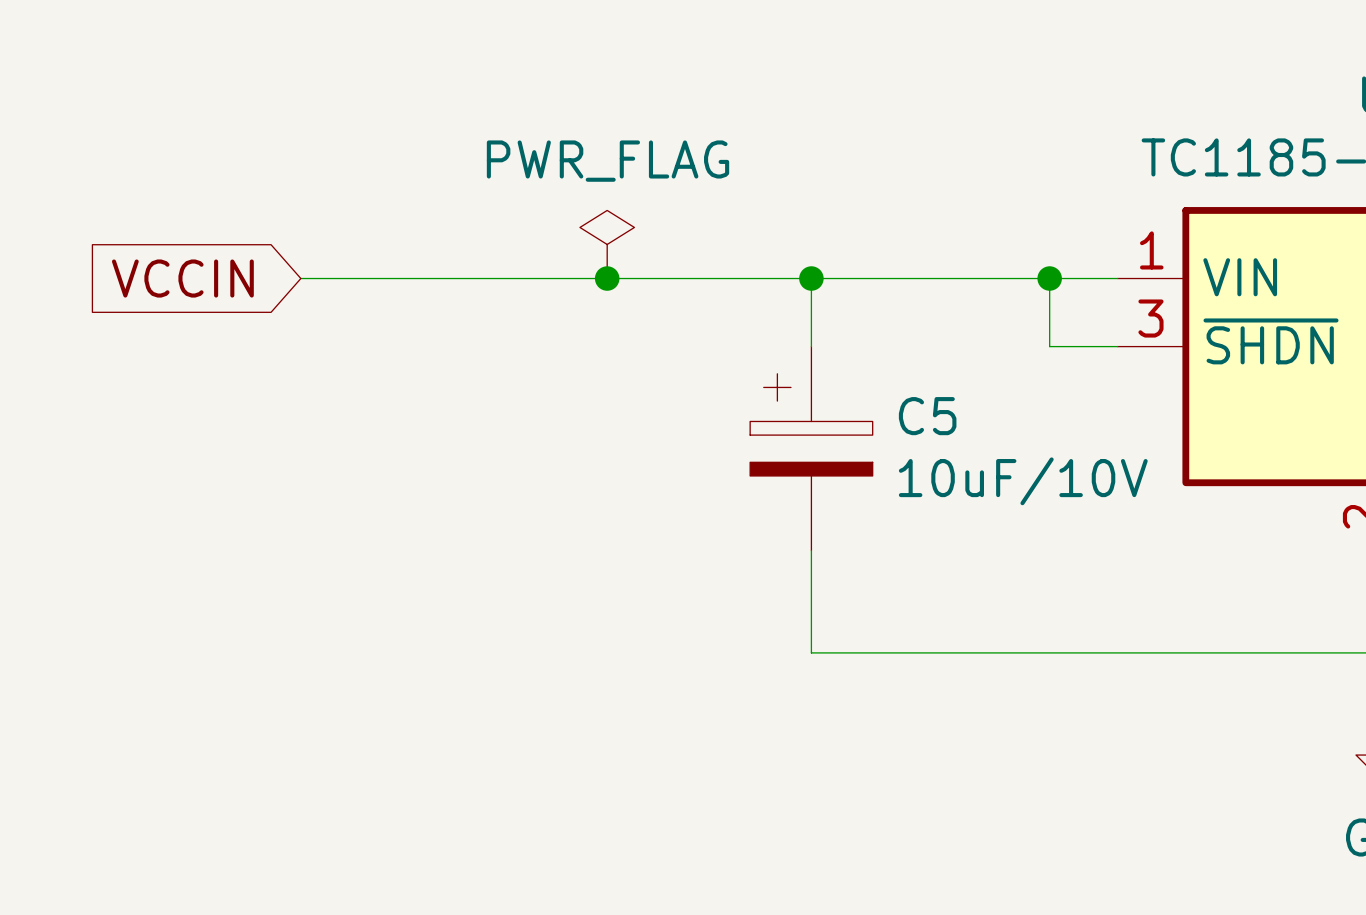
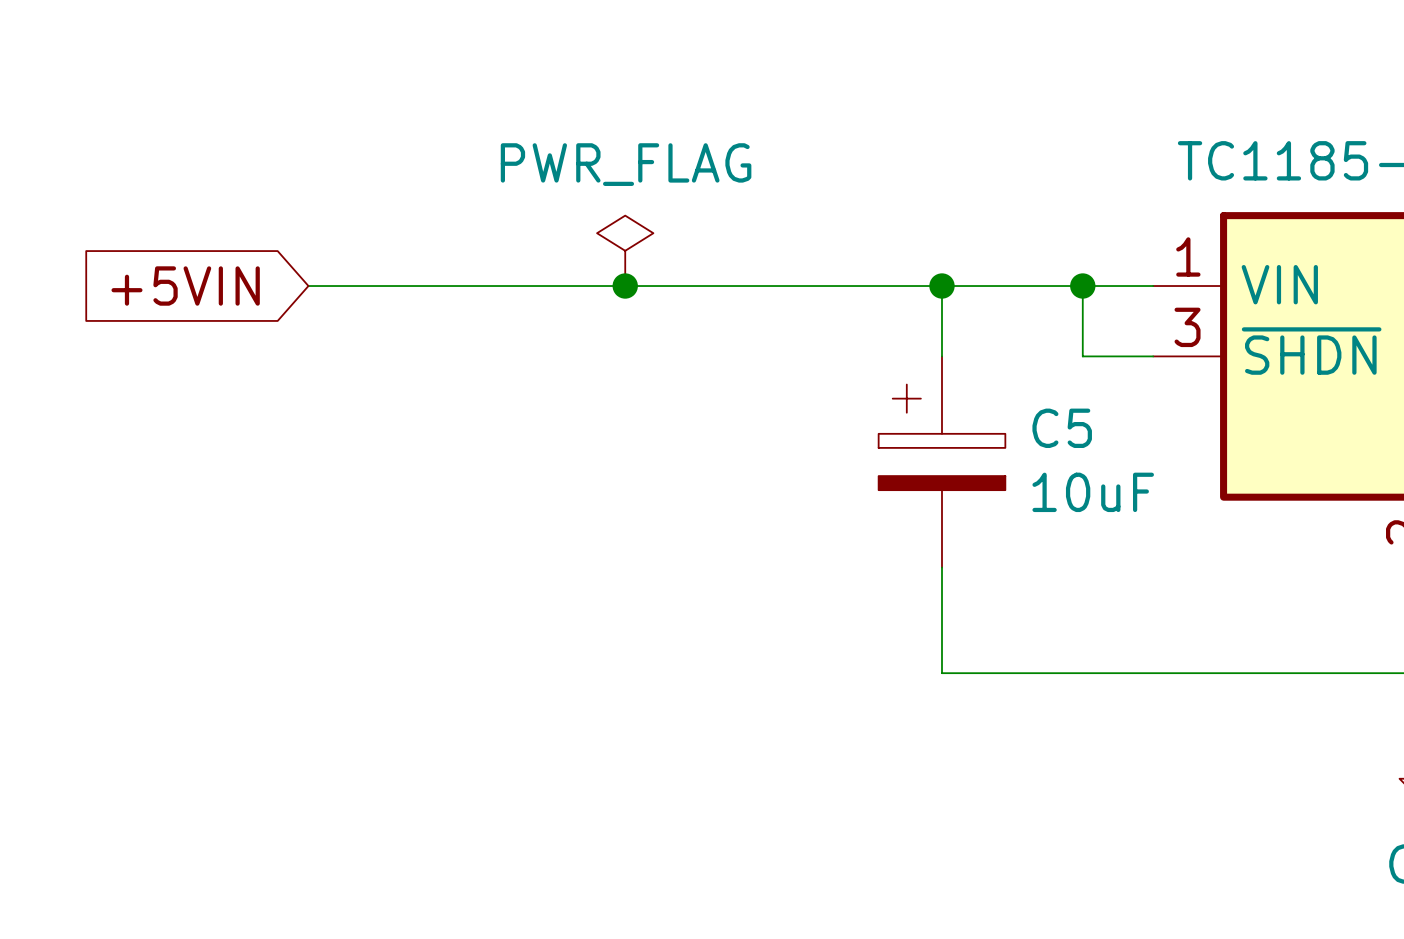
global label: VCCIN (182, 278) -> +5VIN (185, 286)
wire: (811, 278) (811, 346) -> (941, 286) (941, 356)
junction position: (811, 278) -> (941, 286)
C5 position: (811, 448) -> (941, 461)
C5 value: 10uF/10V (1023, 481) -> 10uF (1093, 492)
wire: (811, 550) (811, 652) (913, 652) -> (941, 567) (941, 673)

